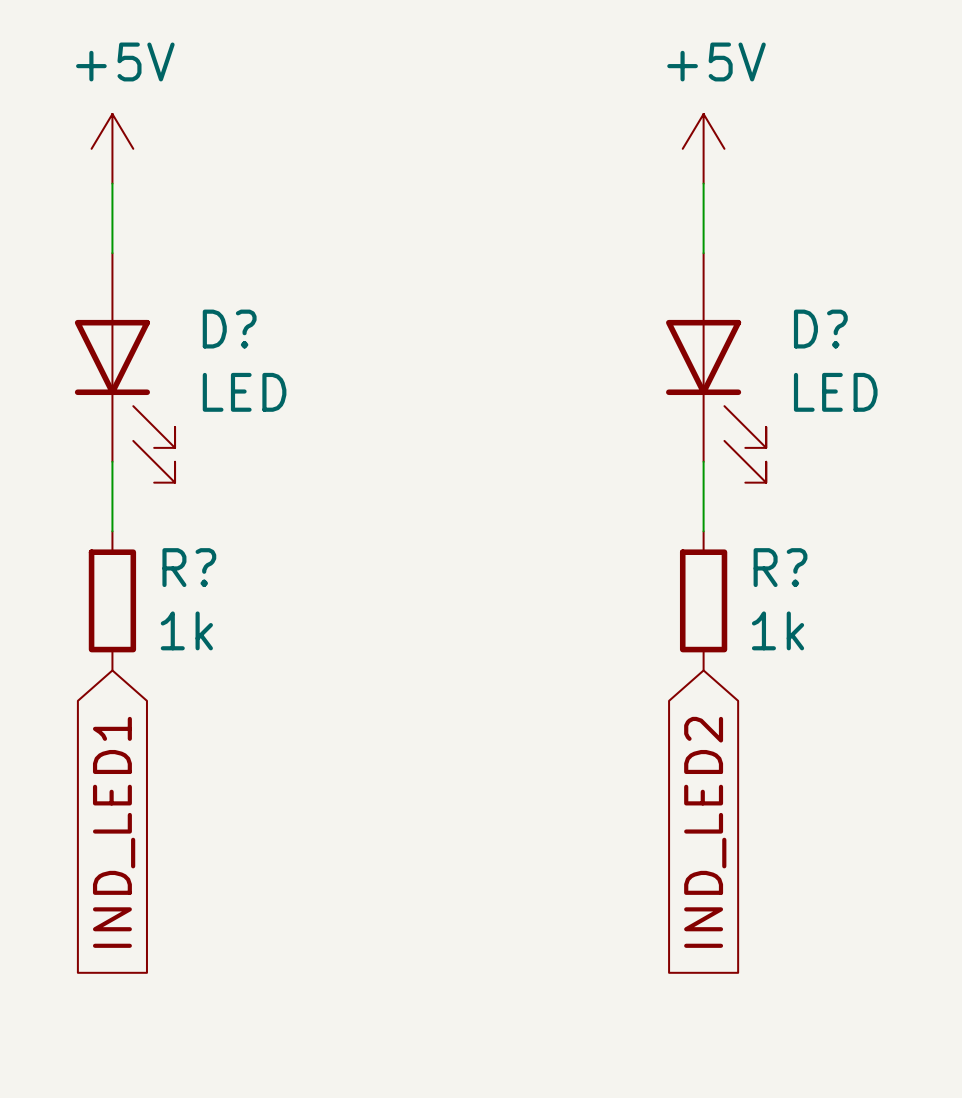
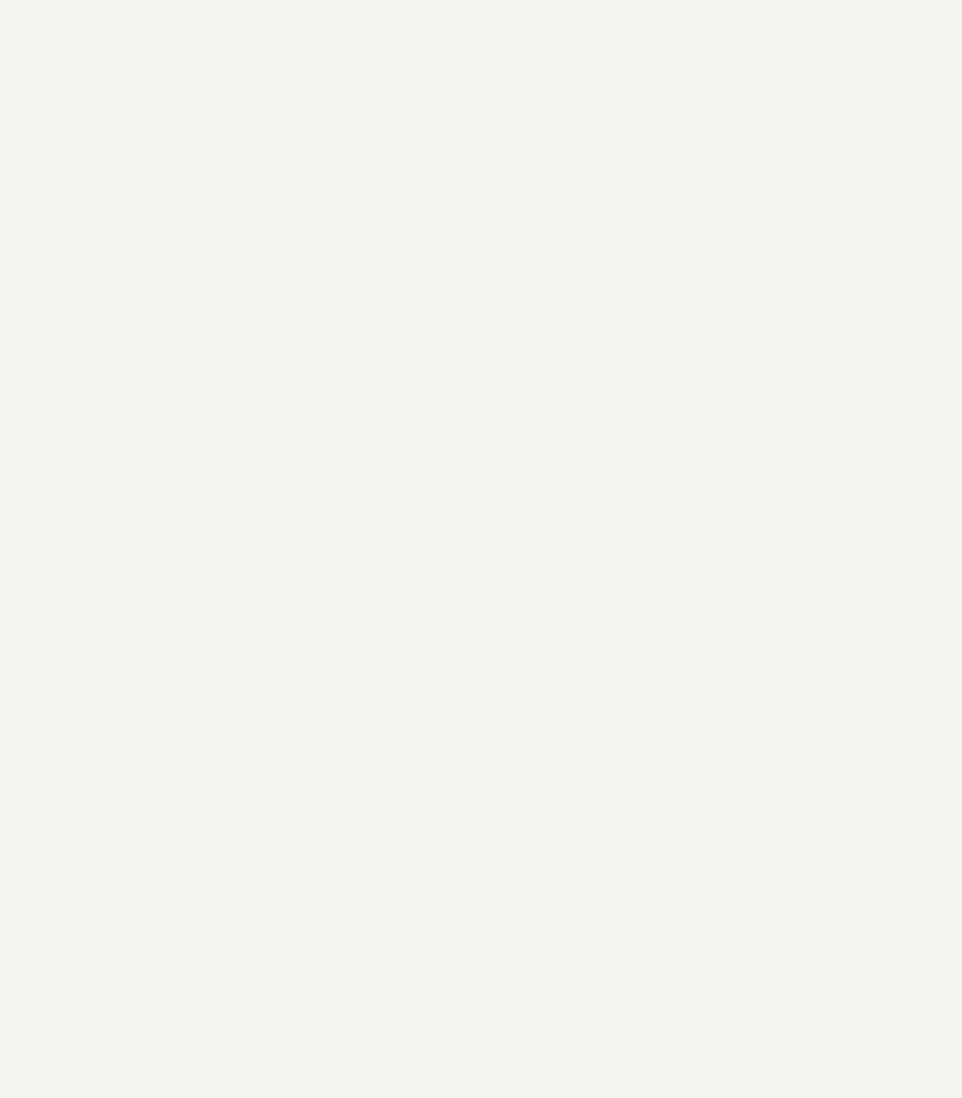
power symbol: +5V (112, 148) -> none
power symbol: +5V (703, 148) -> none
wire: (112, 183) (112, 253) -> none
wire: (703, 183) (703, 253) -> none
D?: LED (124, 367) -> none
D?: LED (716, 367) -> none
wire: (112, 461) (112, 531) -> none
wire: (703, 461) (703, 531) -> none
R?: 1k (112, 600) -> none
R?: 1k (703, 600) -> none
global label: IND_LED1 (114, 832) -> none
global label: IND_LED2 (705, 832) -> none

